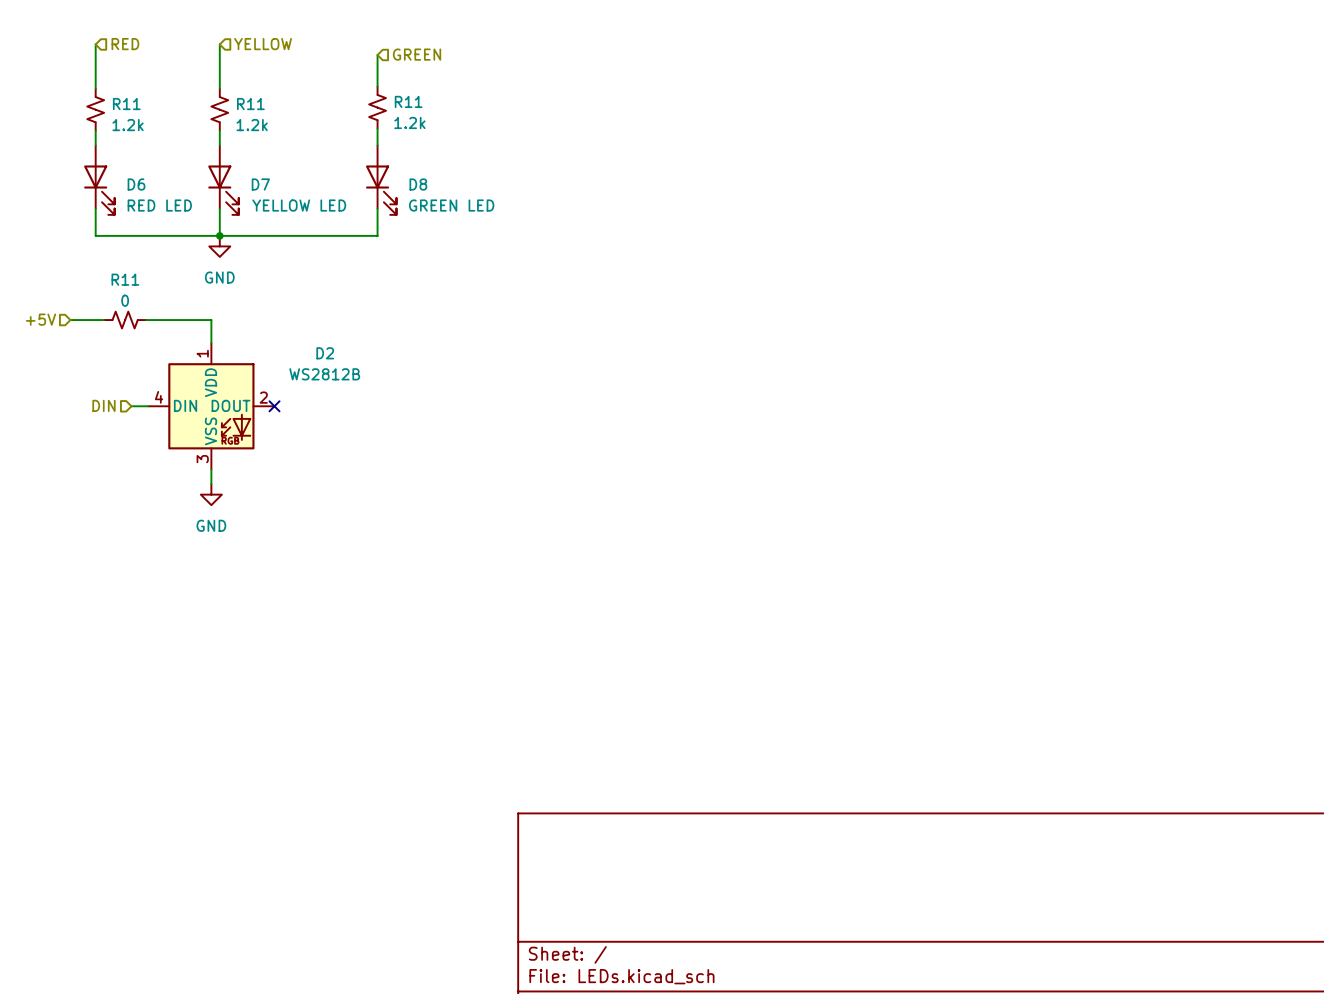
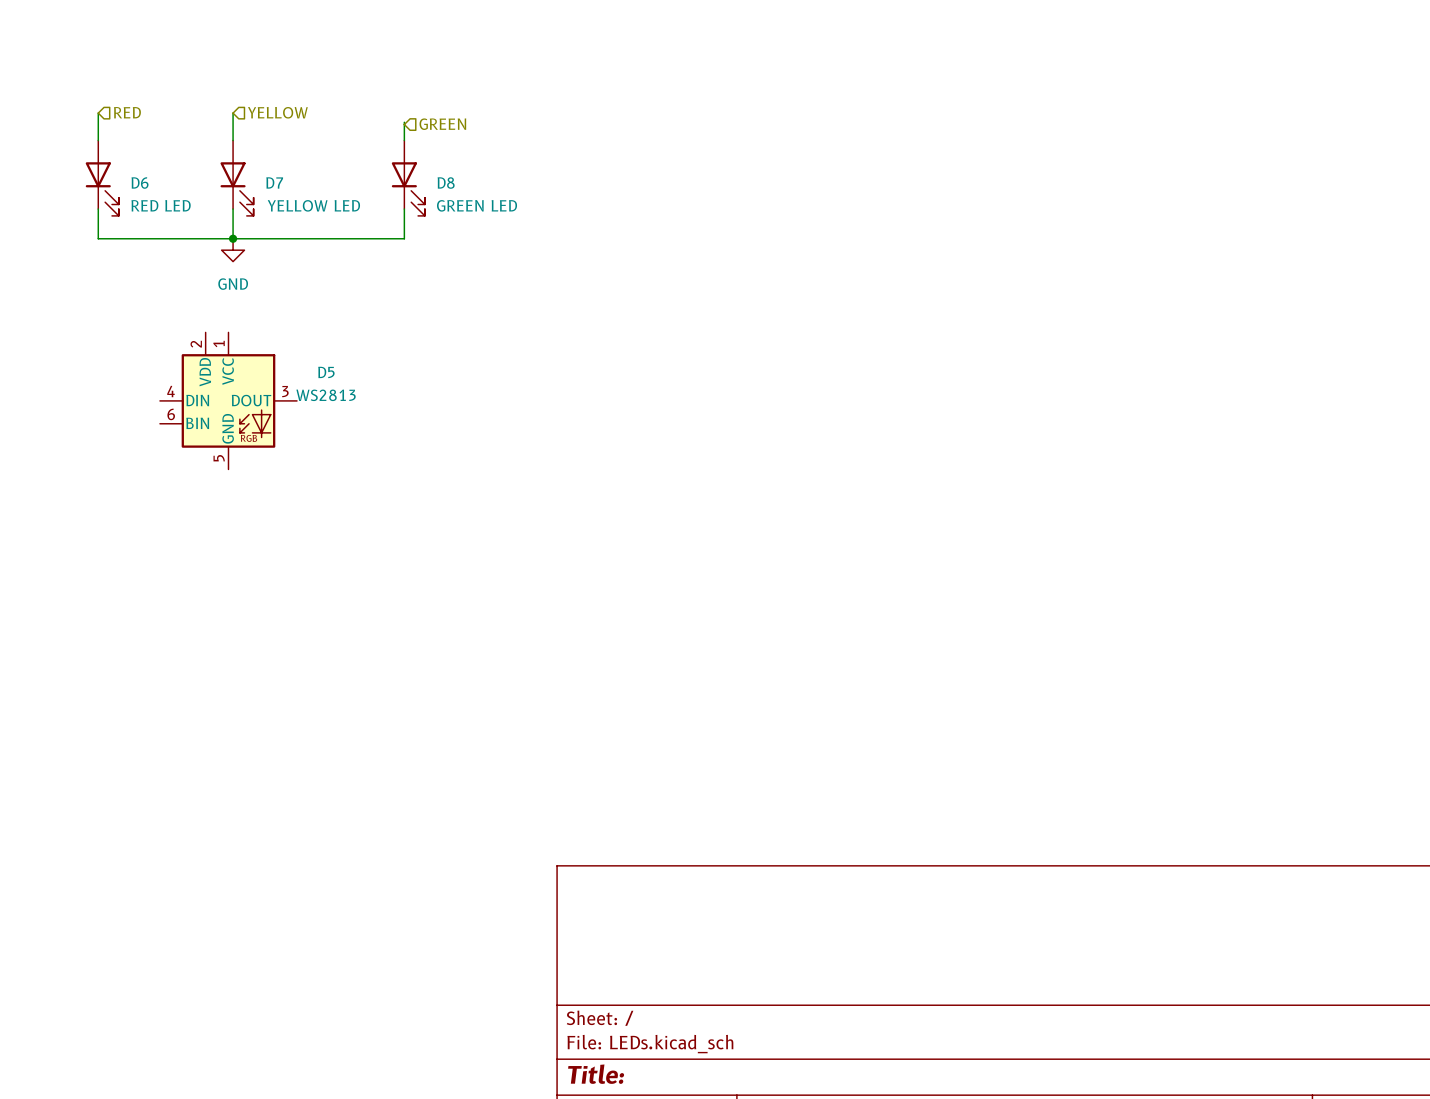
wire: (95, 44) (95, 88) -> none
hierarchical label position: RED (125, 44) -> RED (127, 112)
wire: (219, 44) (219, 88) -> none
hierarchical label position: YELLOW (263, 44) -> YELLOW (277, 112)
hierarchical label position: GREEN (417, 54) -> GREEN (442, 124)
wire: (377, 55) (377, 86) -> none
R11: 1.2k (377, 107) -> none
R11: 1.2k (95, 109) -> none
R11: 1.2k (219, 109) -> none
hierarchical label: +5V (40, 319) -> none
wire: (70, 320) (104, 320) -> none
R11: 0 (125, 320) -> none
wire: (146, 320) (211, 320) (211, 343) -> none
D5: none -> WS2813 (228, 400)
hierarchical label: DIN (103, 405) -> none
wire: (131, 406) (148, 406) -> none
D2: WS2812B (211, 406) -> none
no-connect mark: (274, 406) -> none
wire: (211, 469) (211, 484) -> none
power symbol: GND (211, 494) -> none

